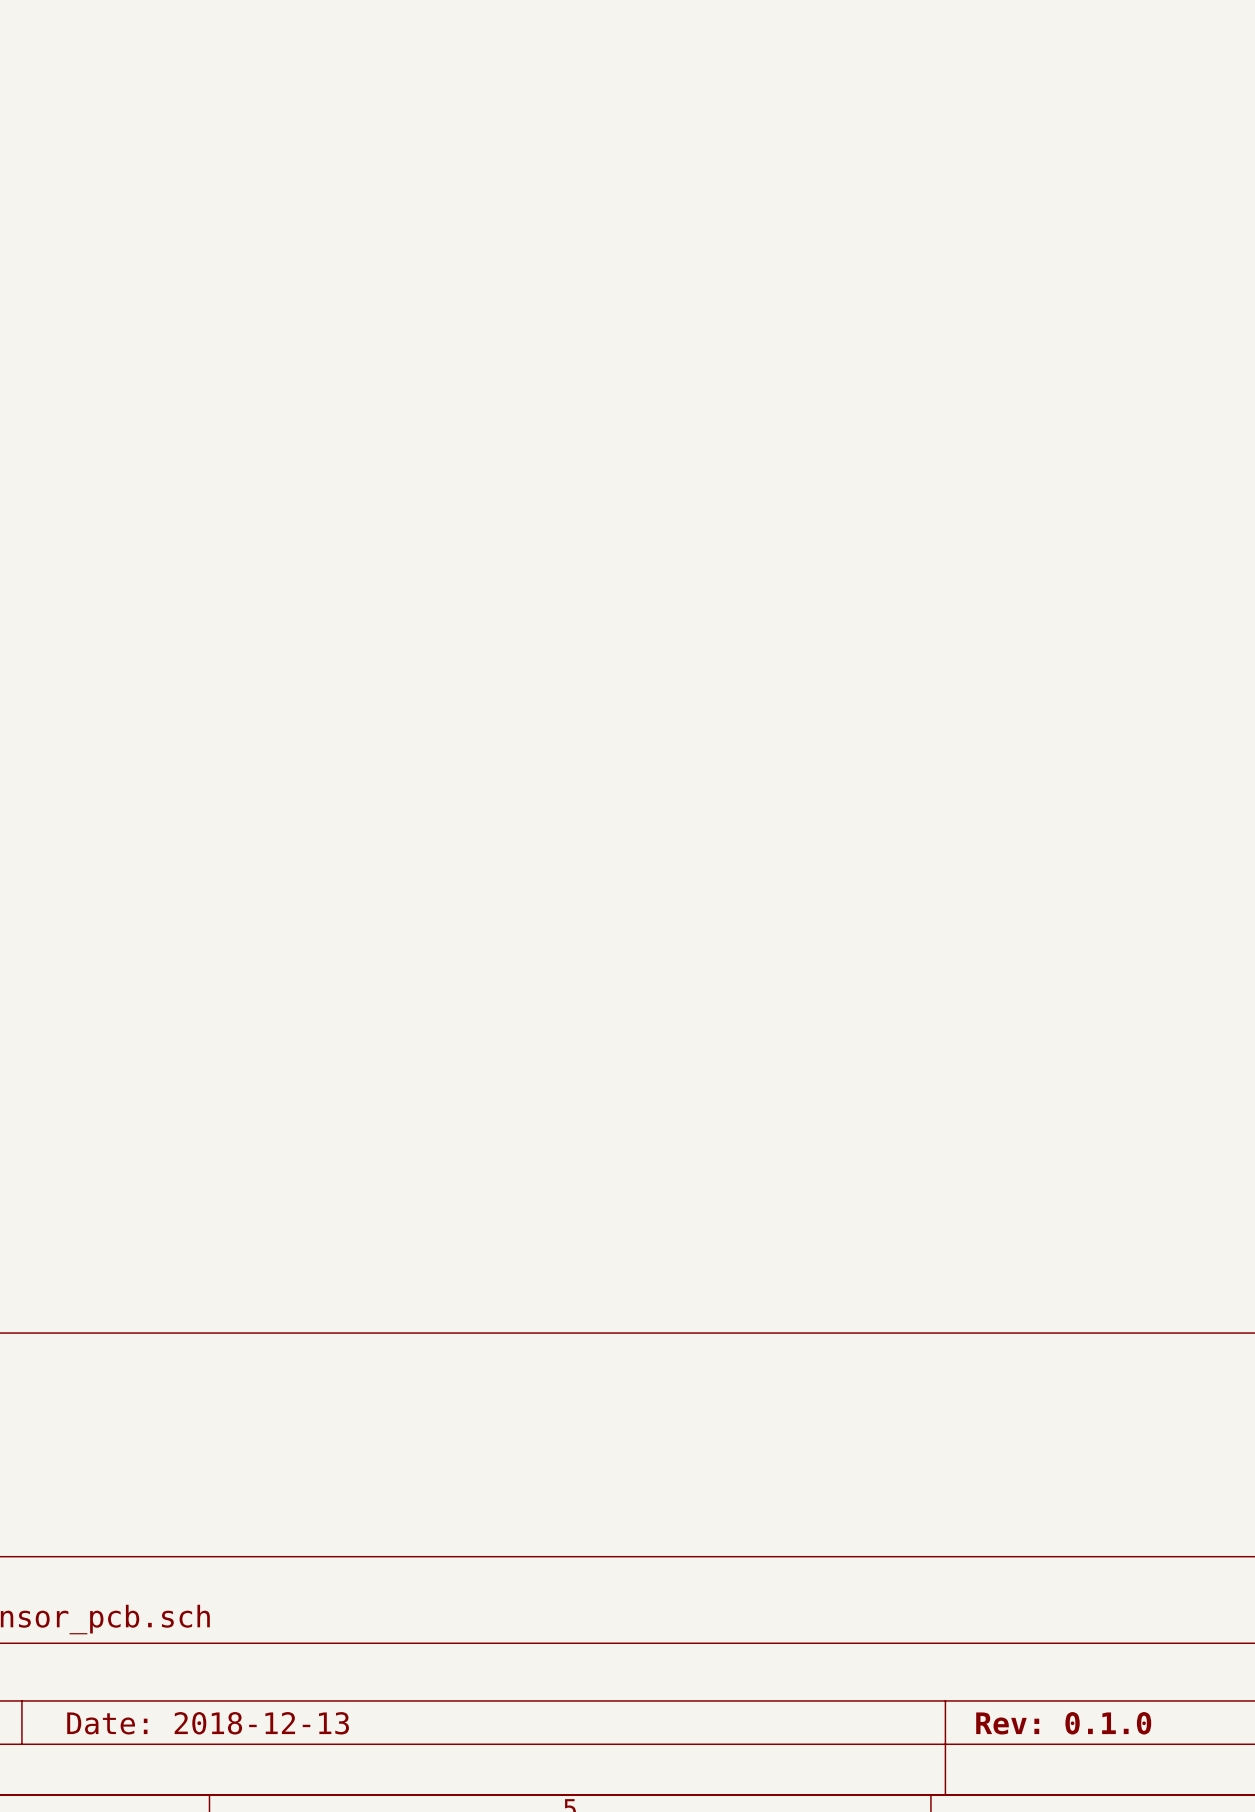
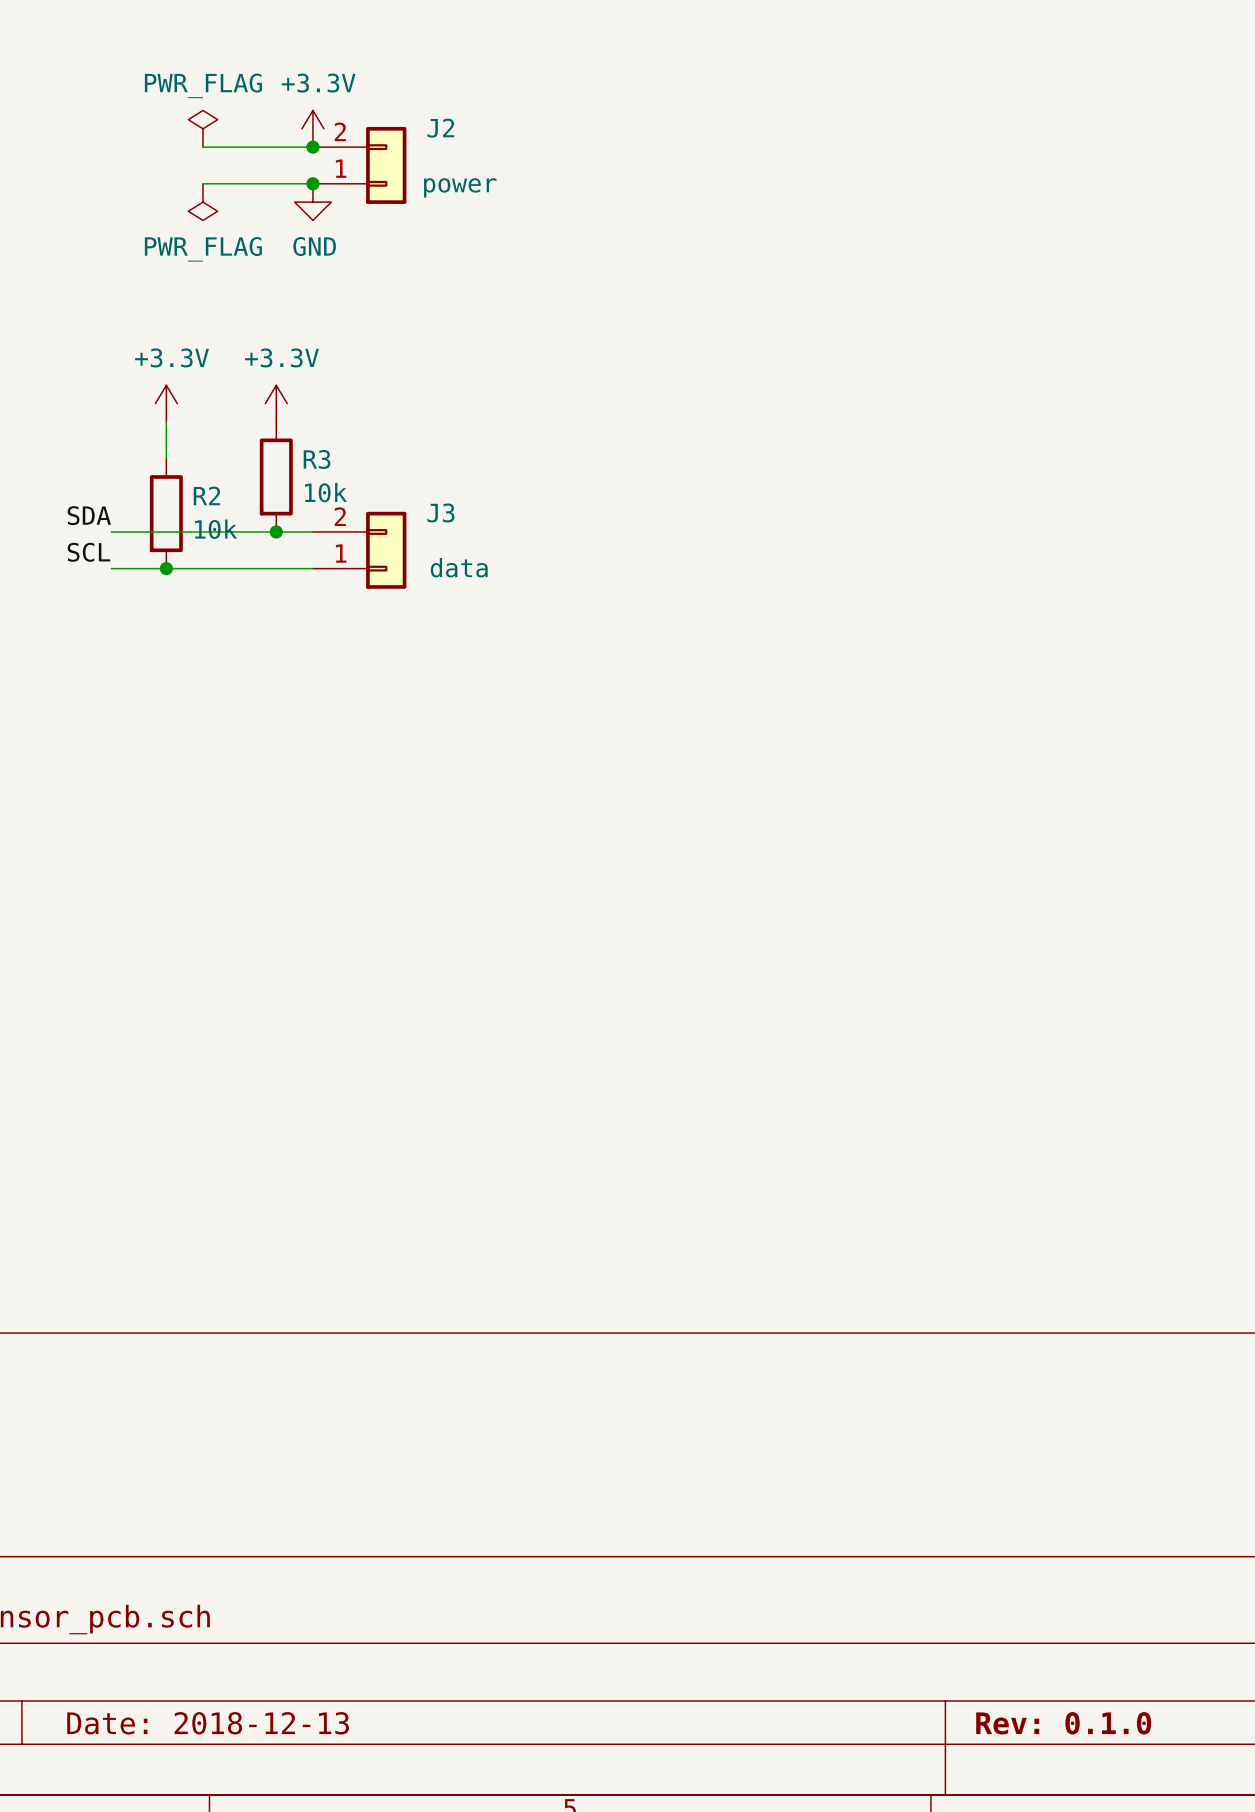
power symbol: none -> PWR_FLAG (202, 128)
power symbol: none -> +3.3V (312, 128)
wire: none -> (202, 147) (312, 147)
junction: none -> (312, 147)
J2: none -> power (359, 165)
wire: none -> (202, 183) (312, 183)
junction: none -> (312, 183)
power symbol: none -> PWR_FLAG (202, 202)
power symbol: none -> GND (312, 202)
power symbol: none -> +3.3V (166, 403)
power symbol: none -> +3.3V (276, 403)
wire: none -> (166, 422) (166, 458)
R3: none -> 10k (276, 476)
R2: none -> 10k (166, 513)
label: none -> SDA (89, 515)
wire: none -> (111, 531) (312, 531)
junction: none -> (276, 531)
J3: none -> data (359, 550)
label: none -> SCL (88, 552)
wire: none -> (111, 568) (312, 568)
junction: none -> (166, 568)

